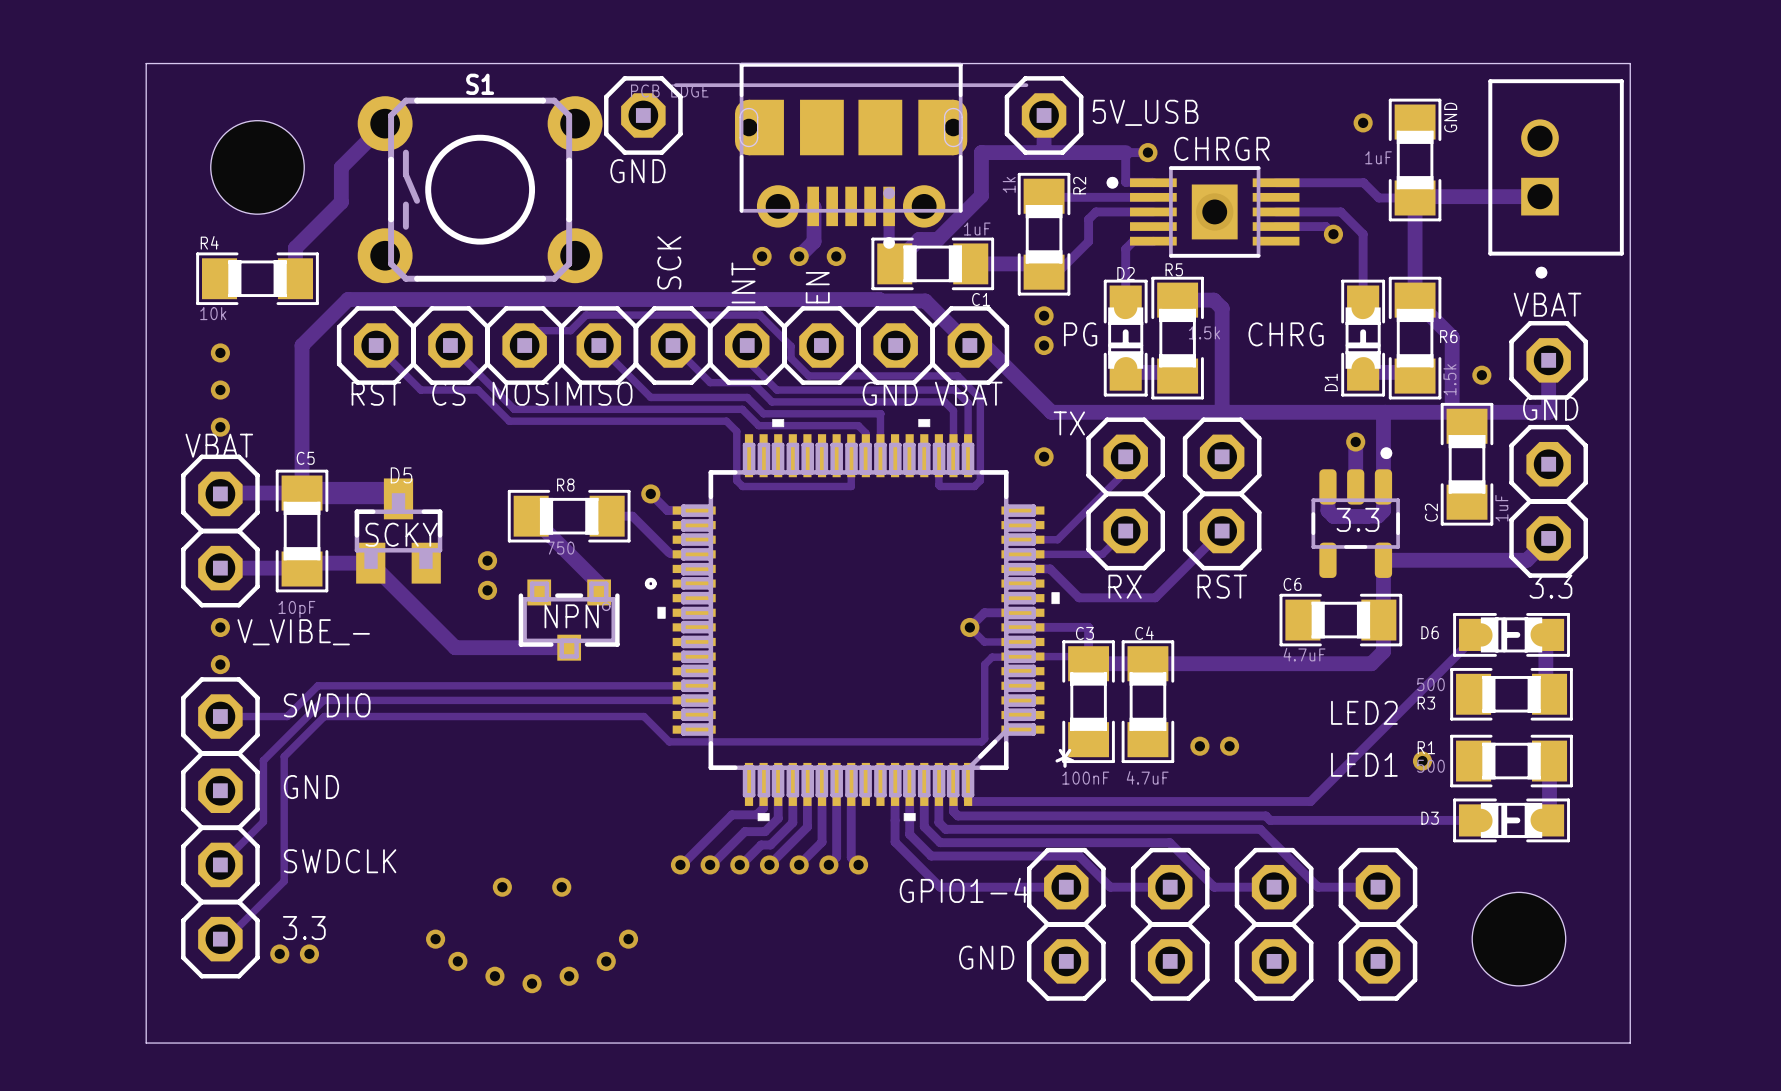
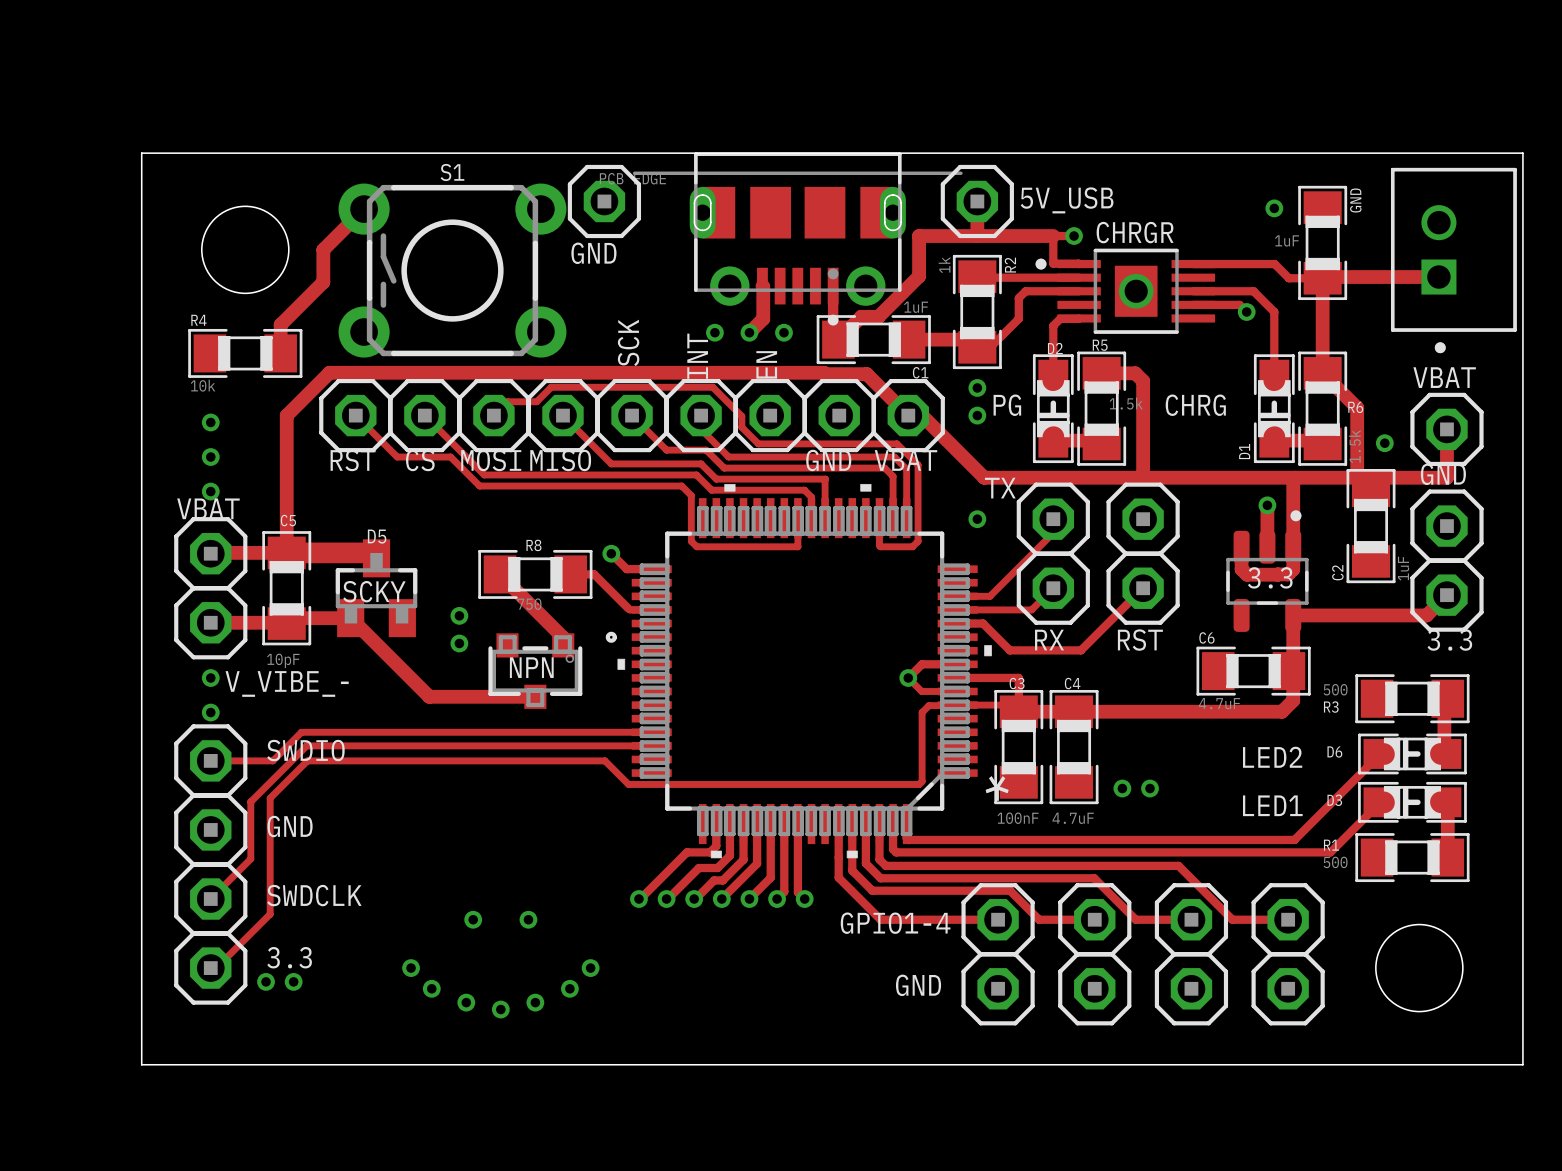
track: (1477, 634) (1310, 801) -> (1380, 753) (1294, 839) (1225, 839)
D6 position: (1511, 634) -> (1412, 753)
R3 position: (1511, 694) -> (1412, 698)
via: (1422, 761) -> none
R1 position: (1511, 761) -> (1412, 857)
track: (956, 814) (1265, 815) (1270, 820) (1477, 820) -> (896, 852) (1330, 852) (1380, 802)
D3 position: (1511, 820) -> (1412, 802)

